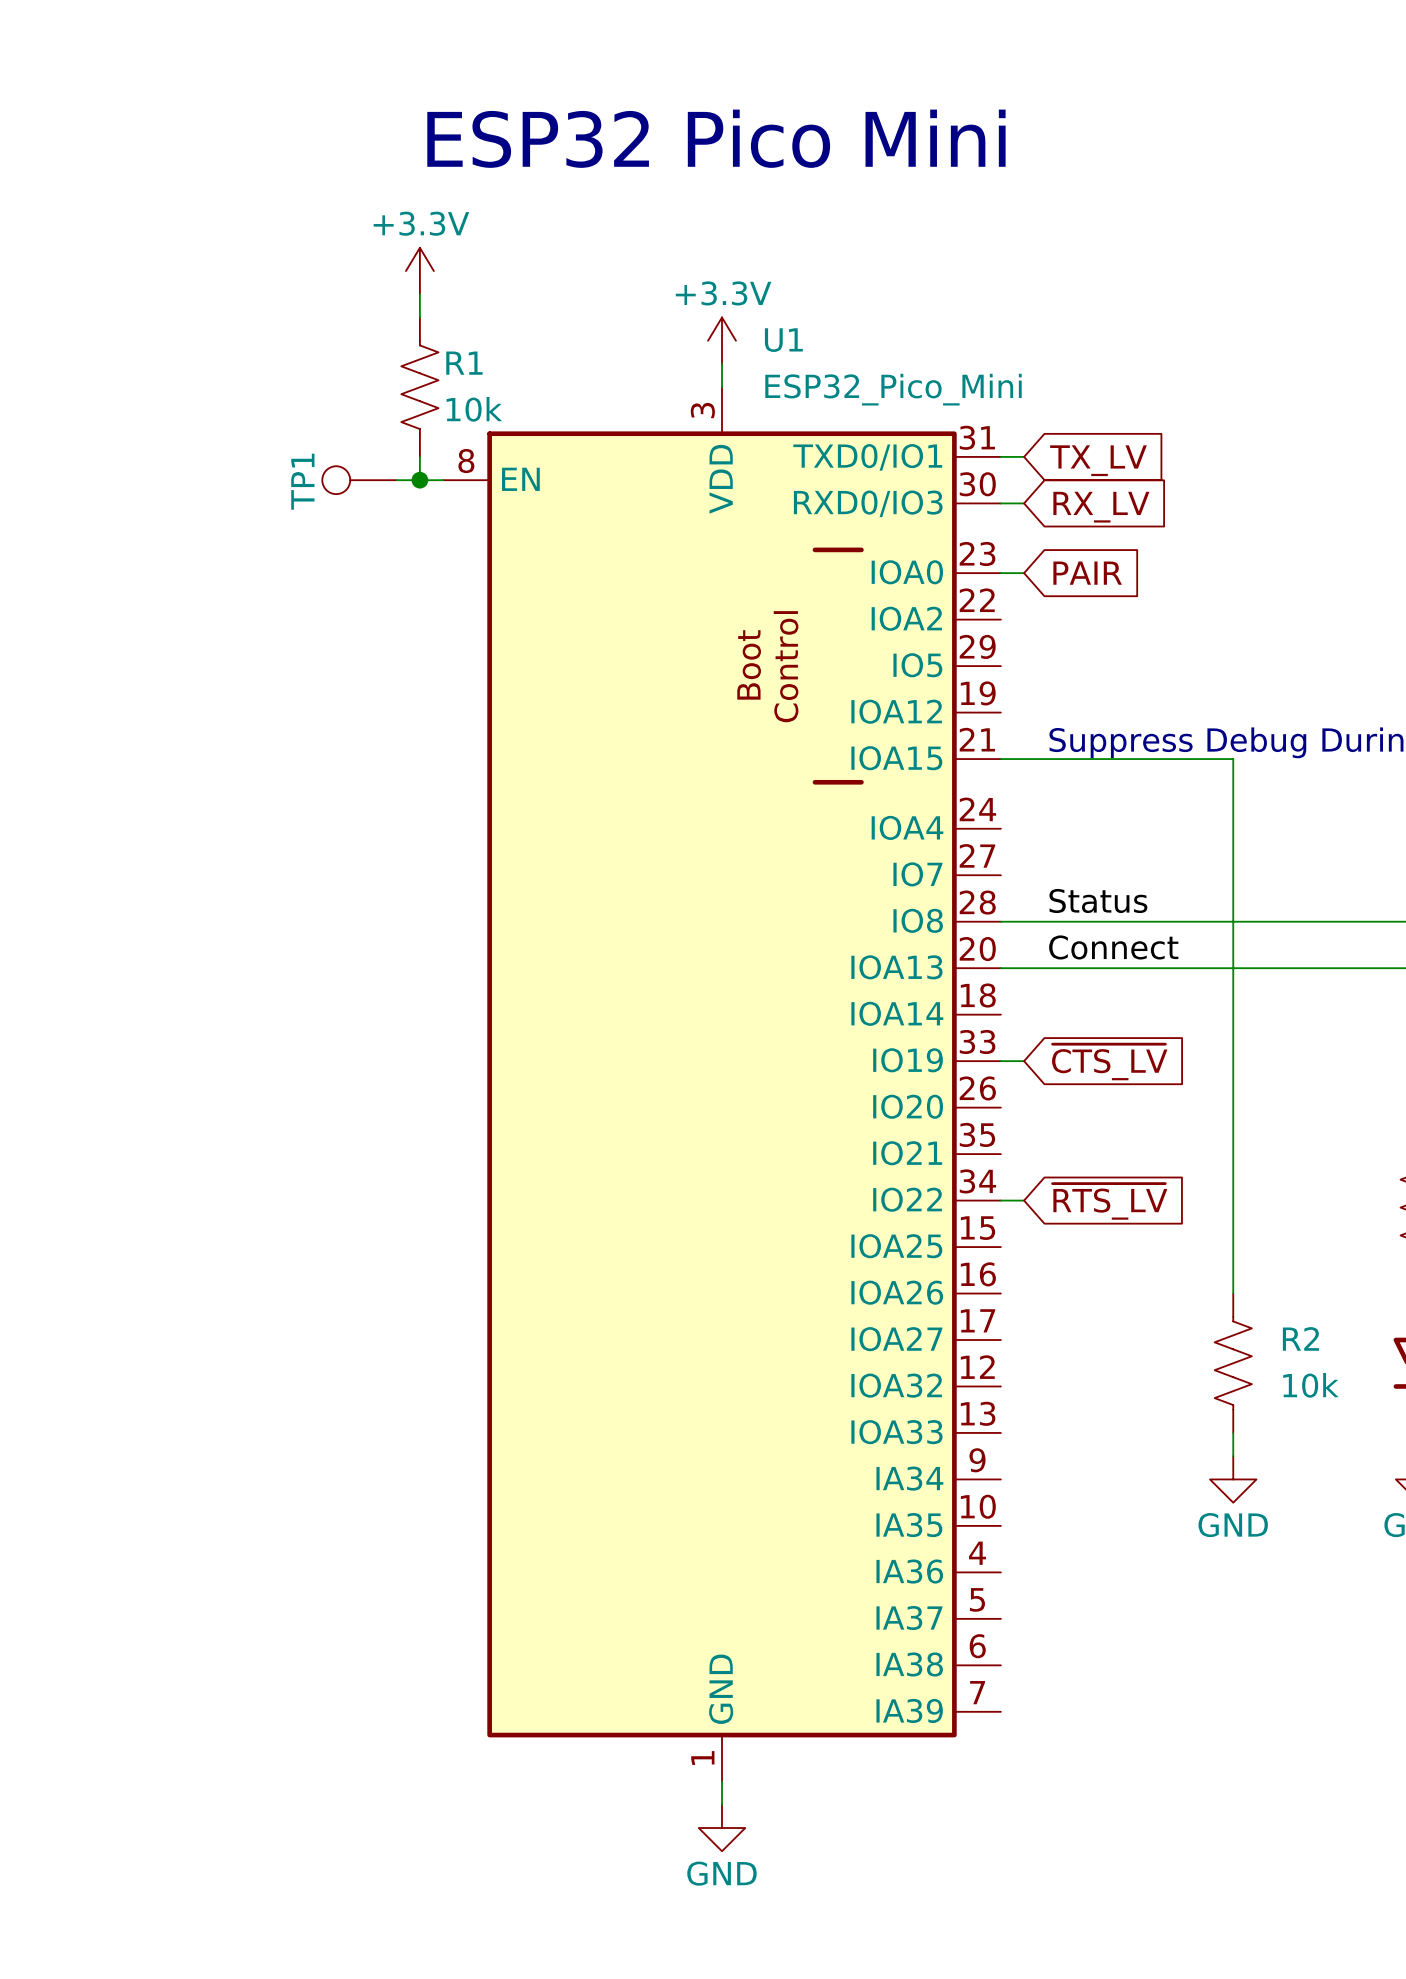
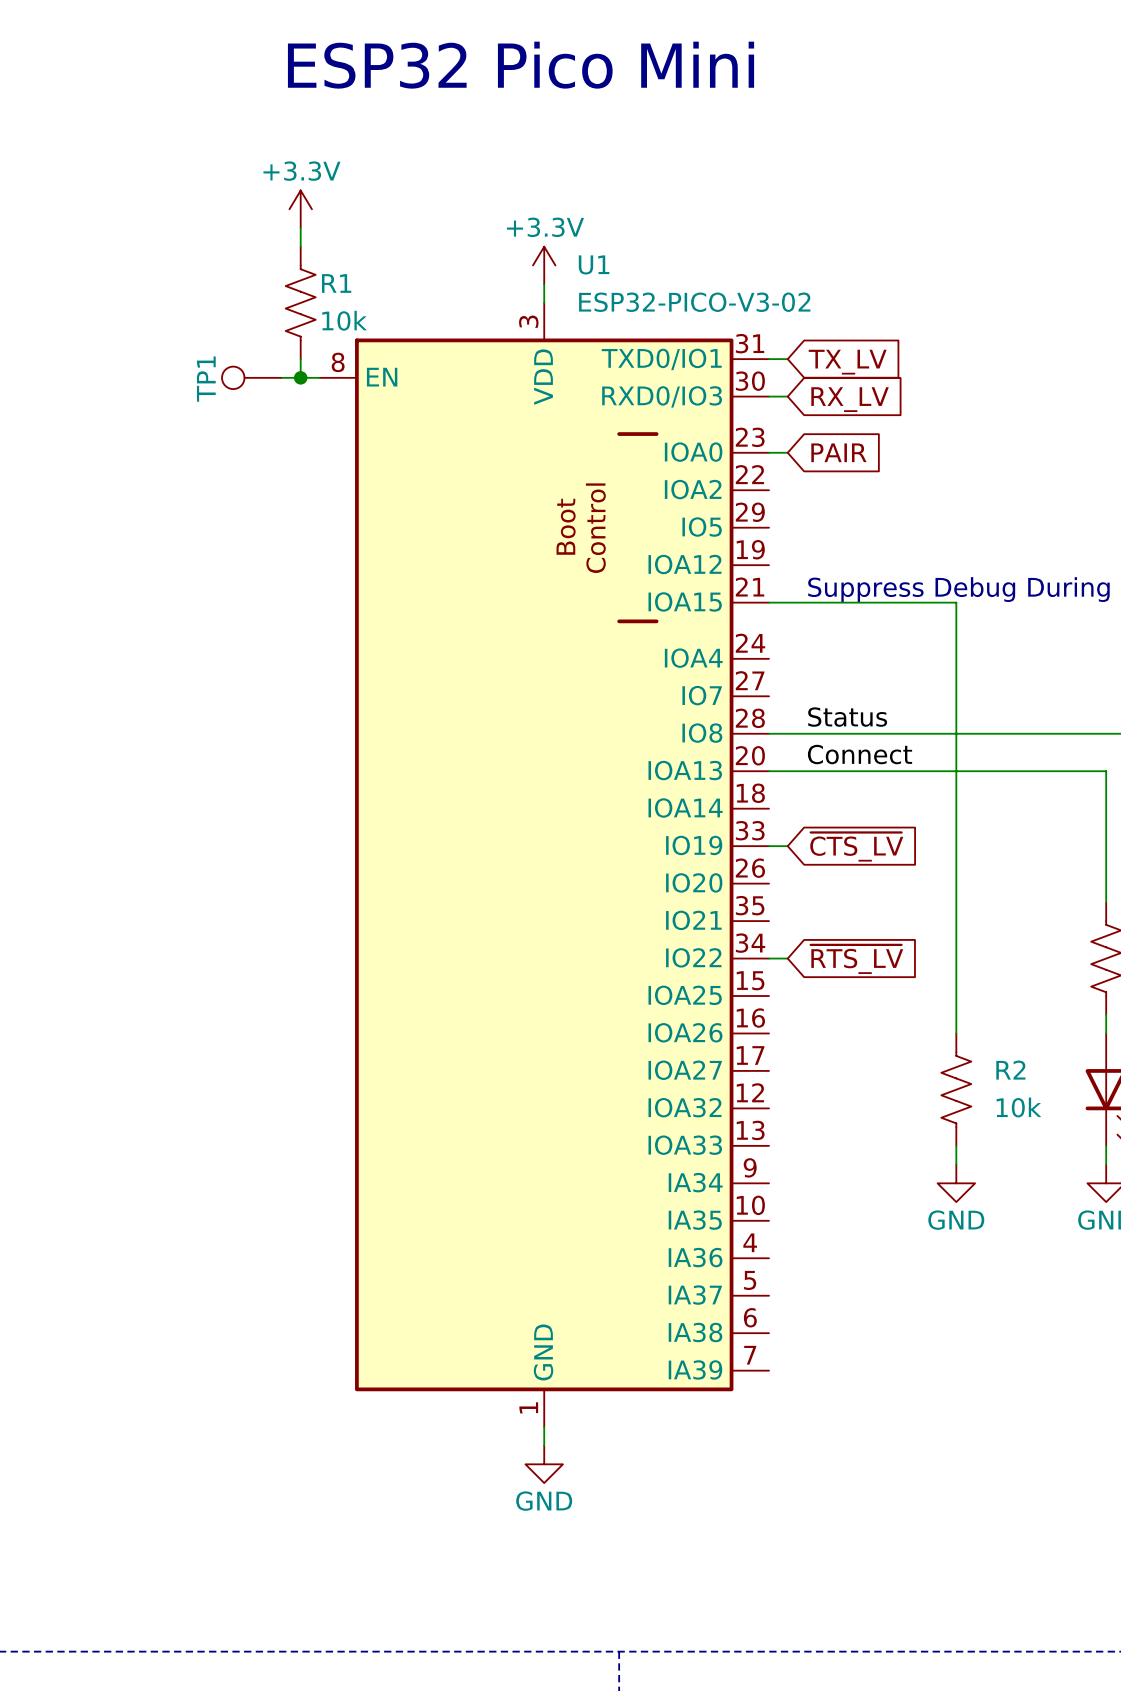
text position: ESP32 Pico Mini (716, 138) -> ESP32 Pico Mini (521, 65)
U1 value: ESP32_Pico_Mini (893, 389) -> ESP32-PICO-V3-02 (694, 302)

